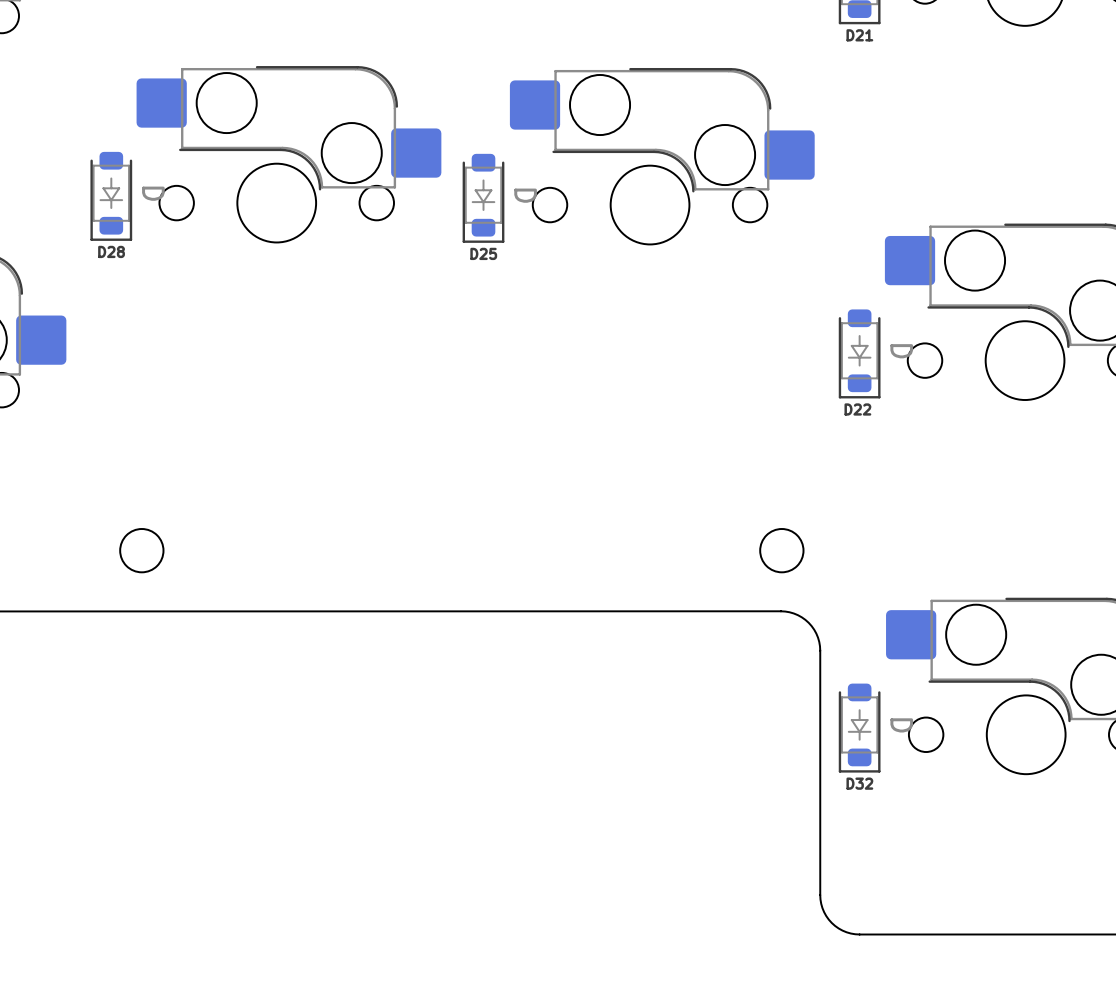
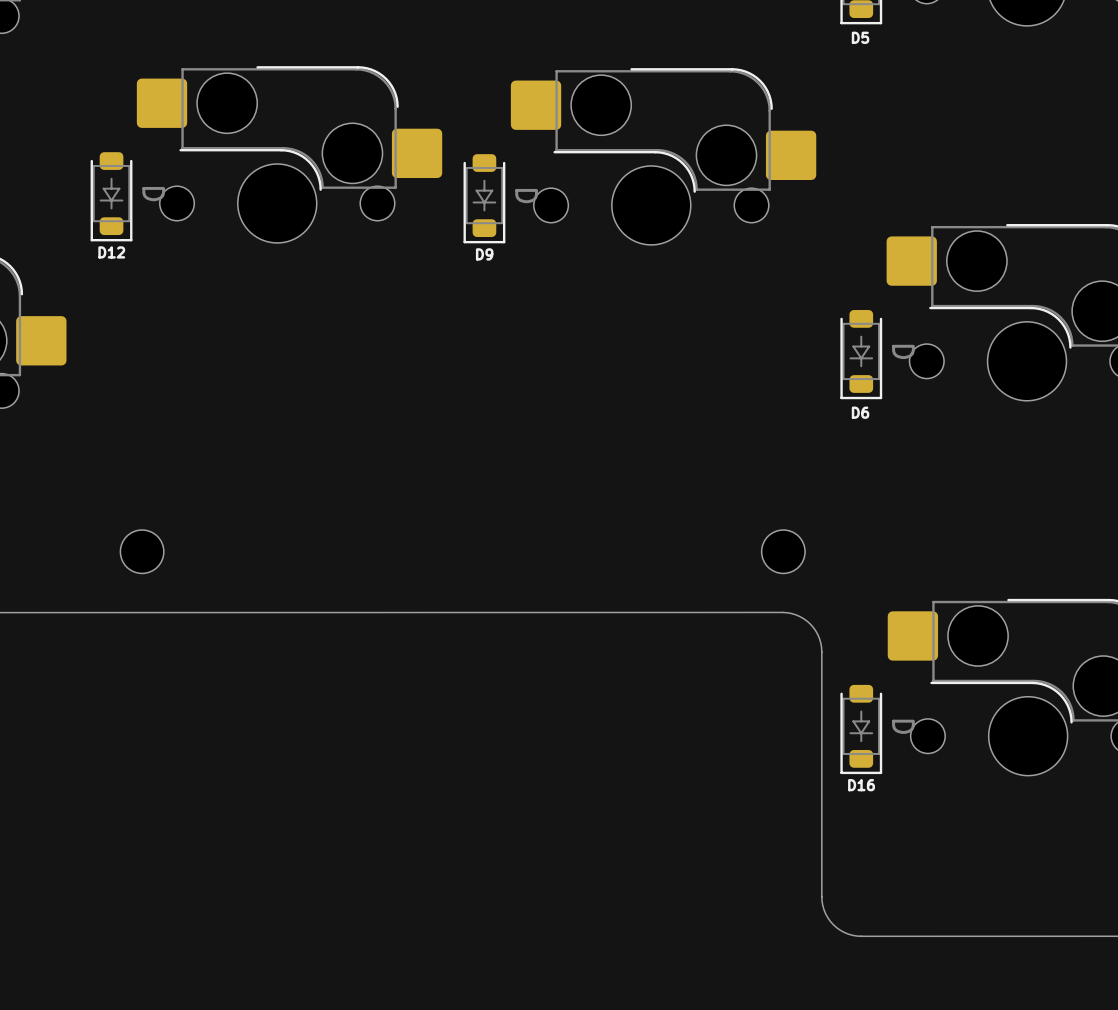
D21 name: D21 (859, 35) -> D5 (860, 37)
D28 name: D28 (111, 251) -> D12 (111, 252)
D25 name: D25 (483, 253) -> D9 (484, 254)
D22 name: D22 (857, 409) -> D6 (860, 412)
D32 name: D32 (859, 783) -> D16 (861, 785)

